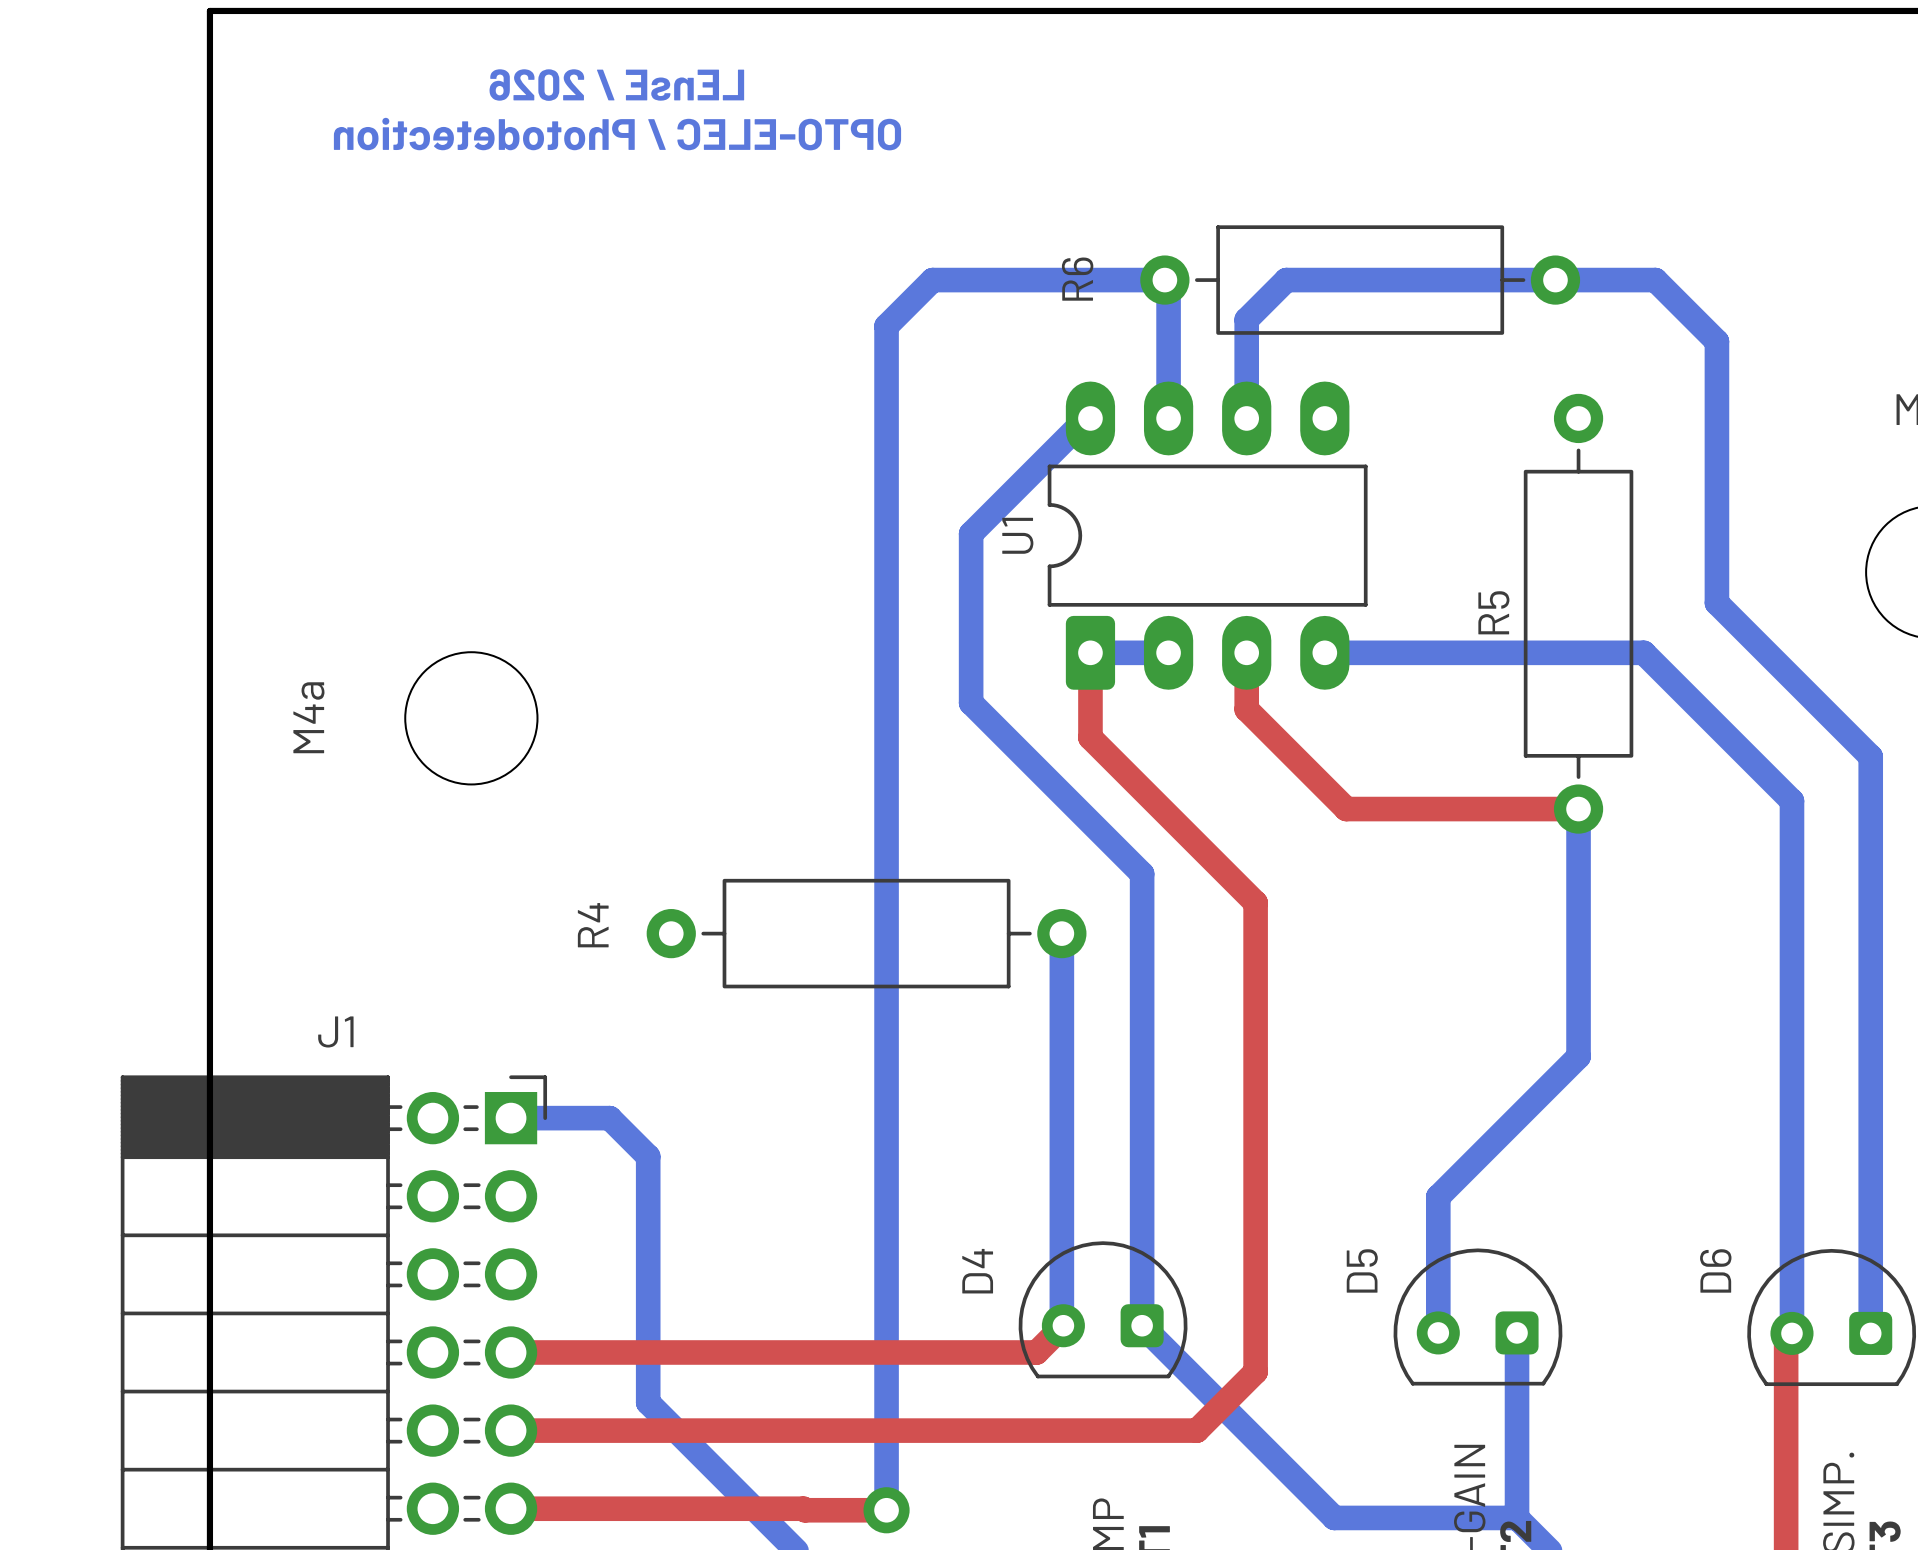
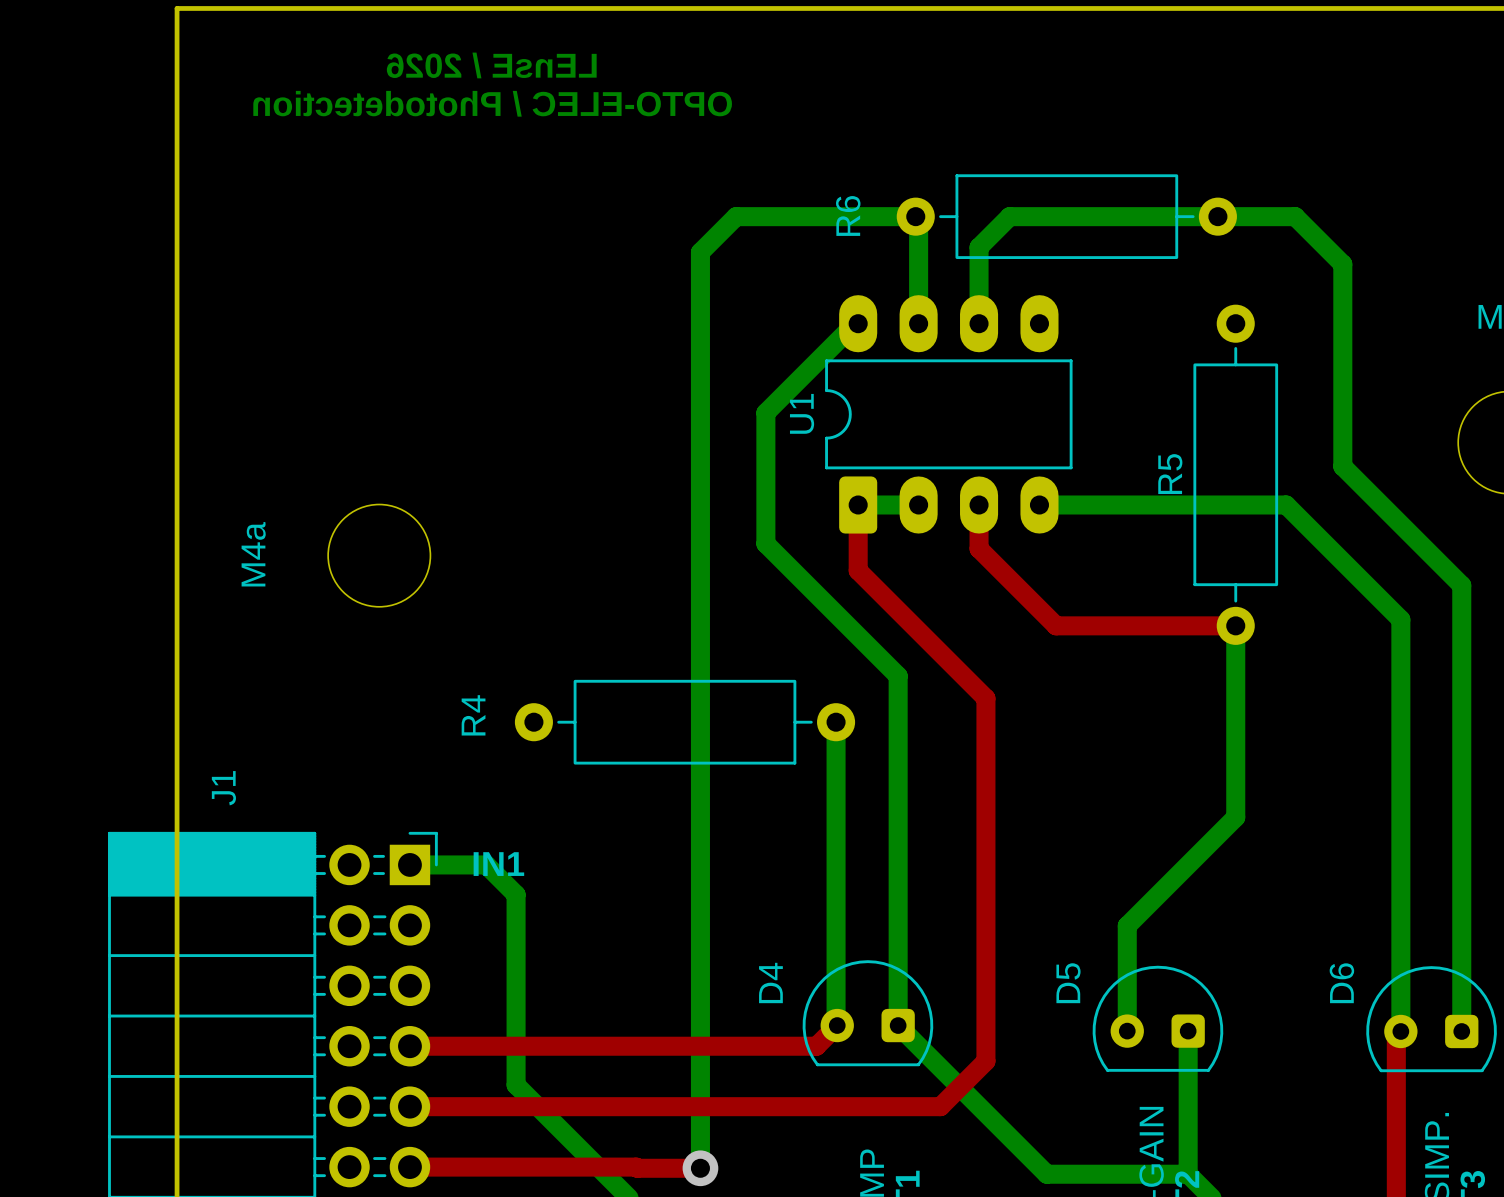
J1 name rotation: 0° (335, 1031) -> 90° counterclockwise (223, 788)
text: none -> IN1 (498, 864)

